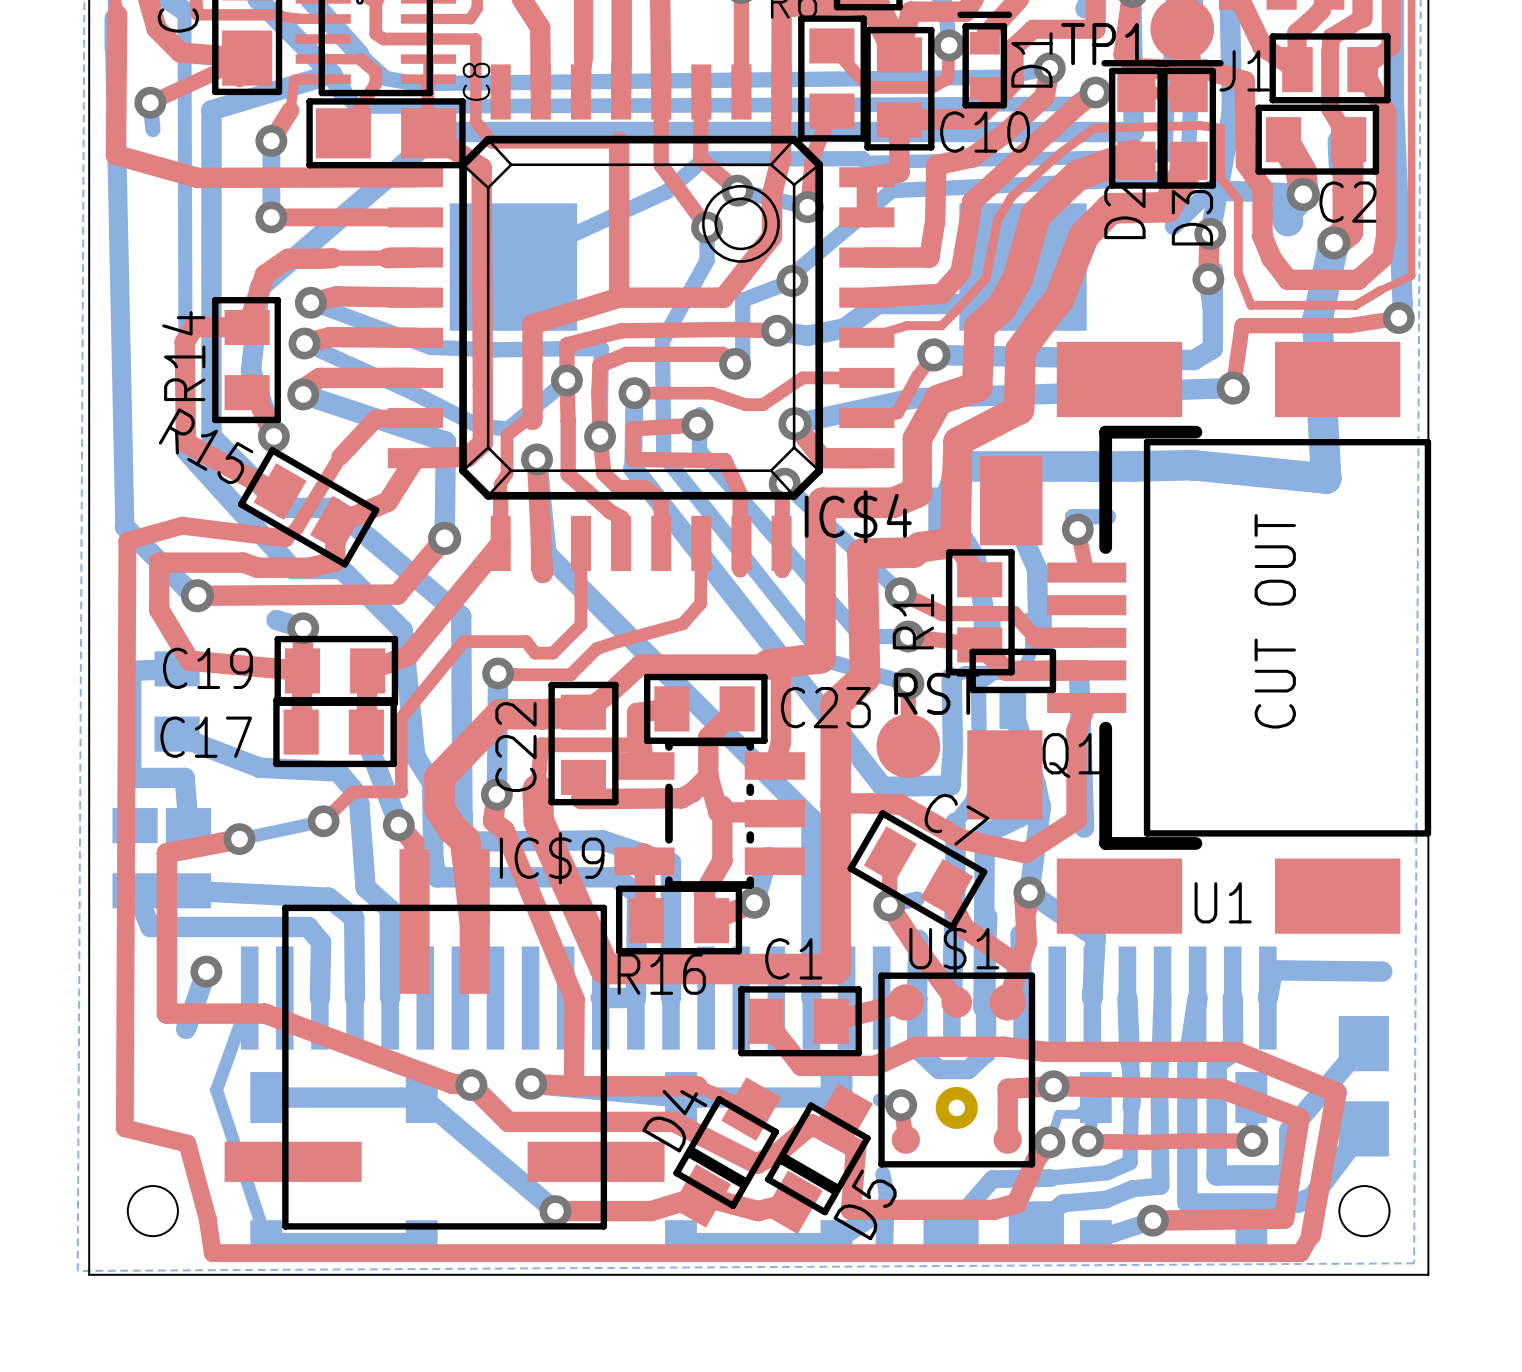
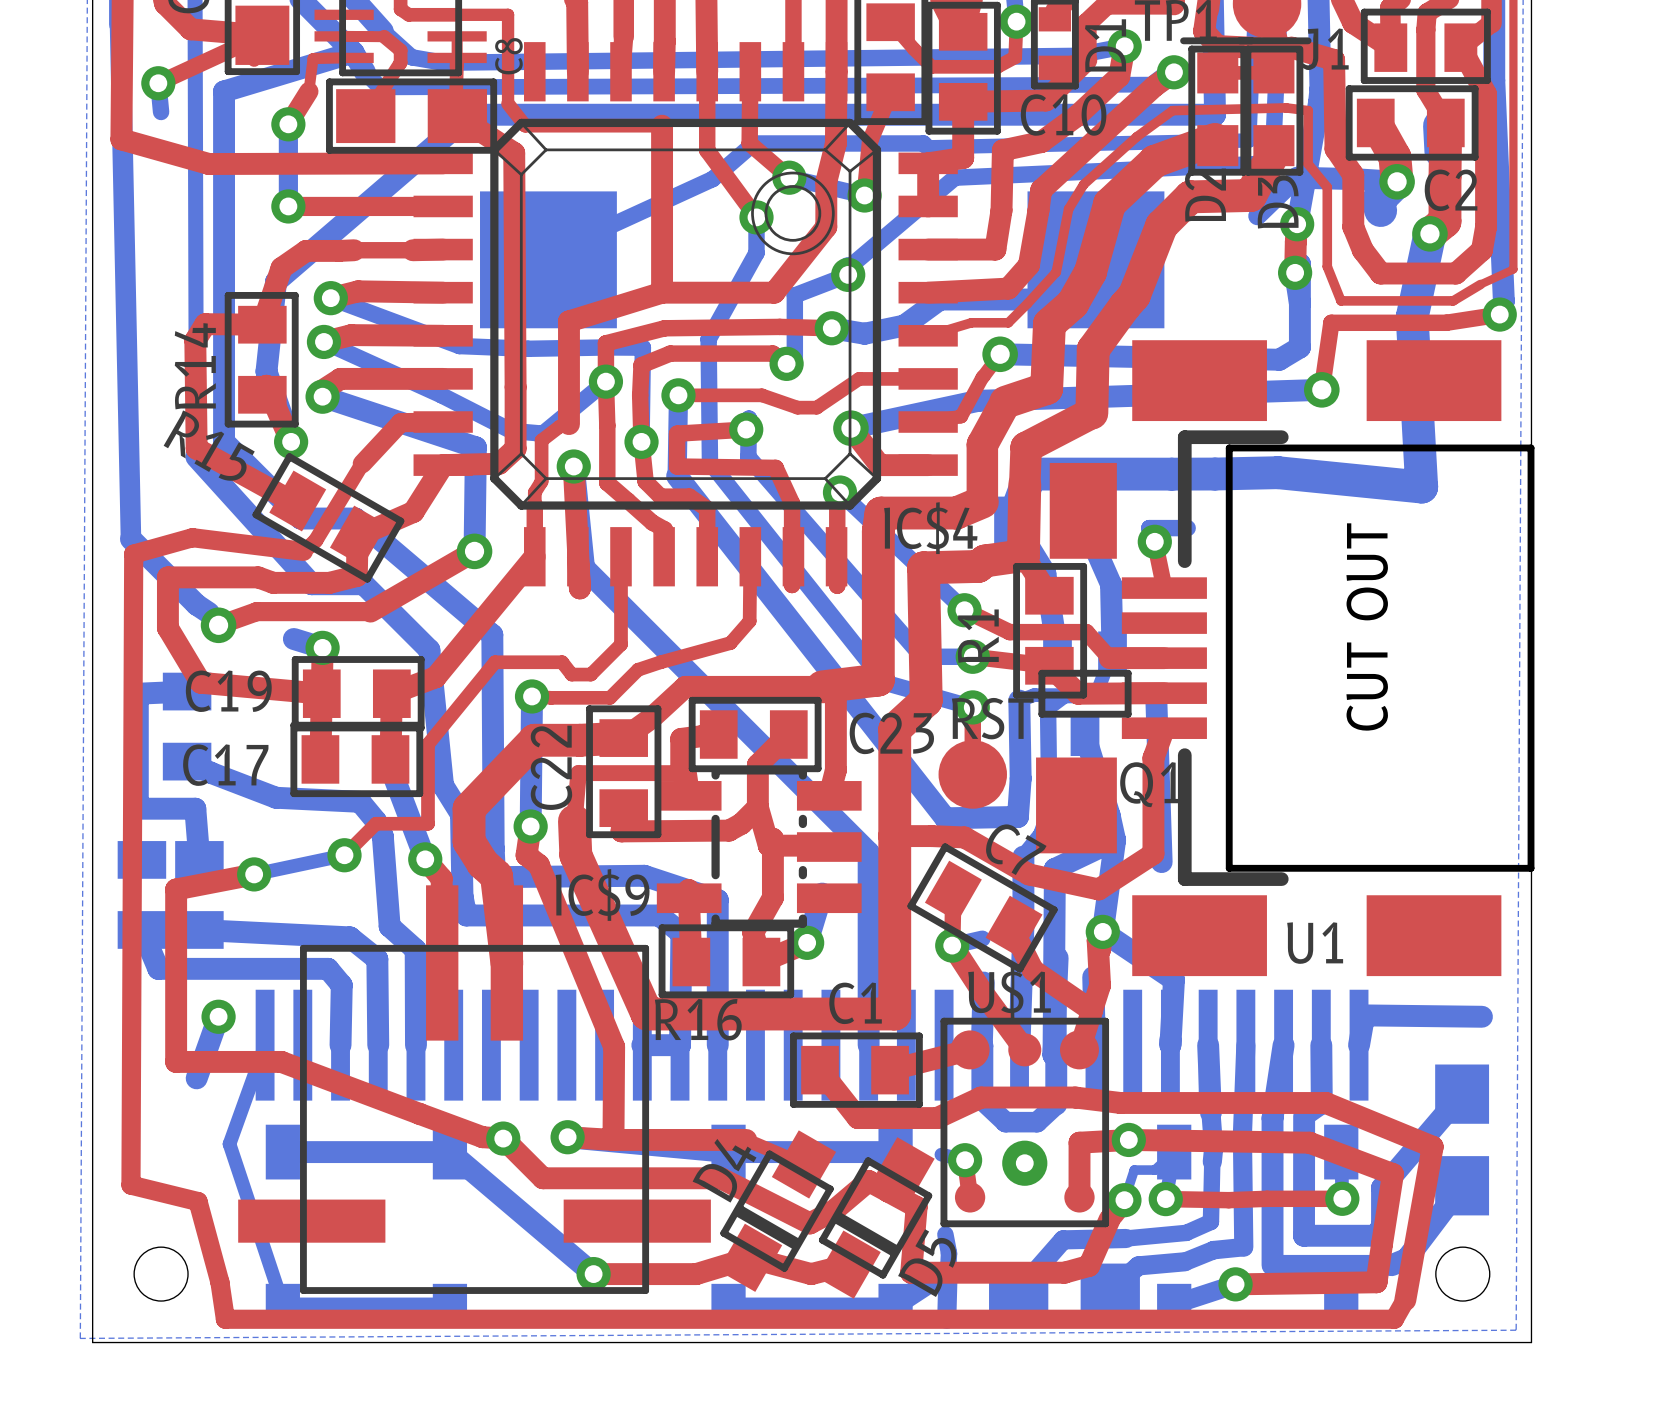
top track: (444, 538) (397, 594) (197, 595) -> (474, 551) (370, 611) (256, 611) (218, 625)
via position: (197, 595) -> (218, 625)

